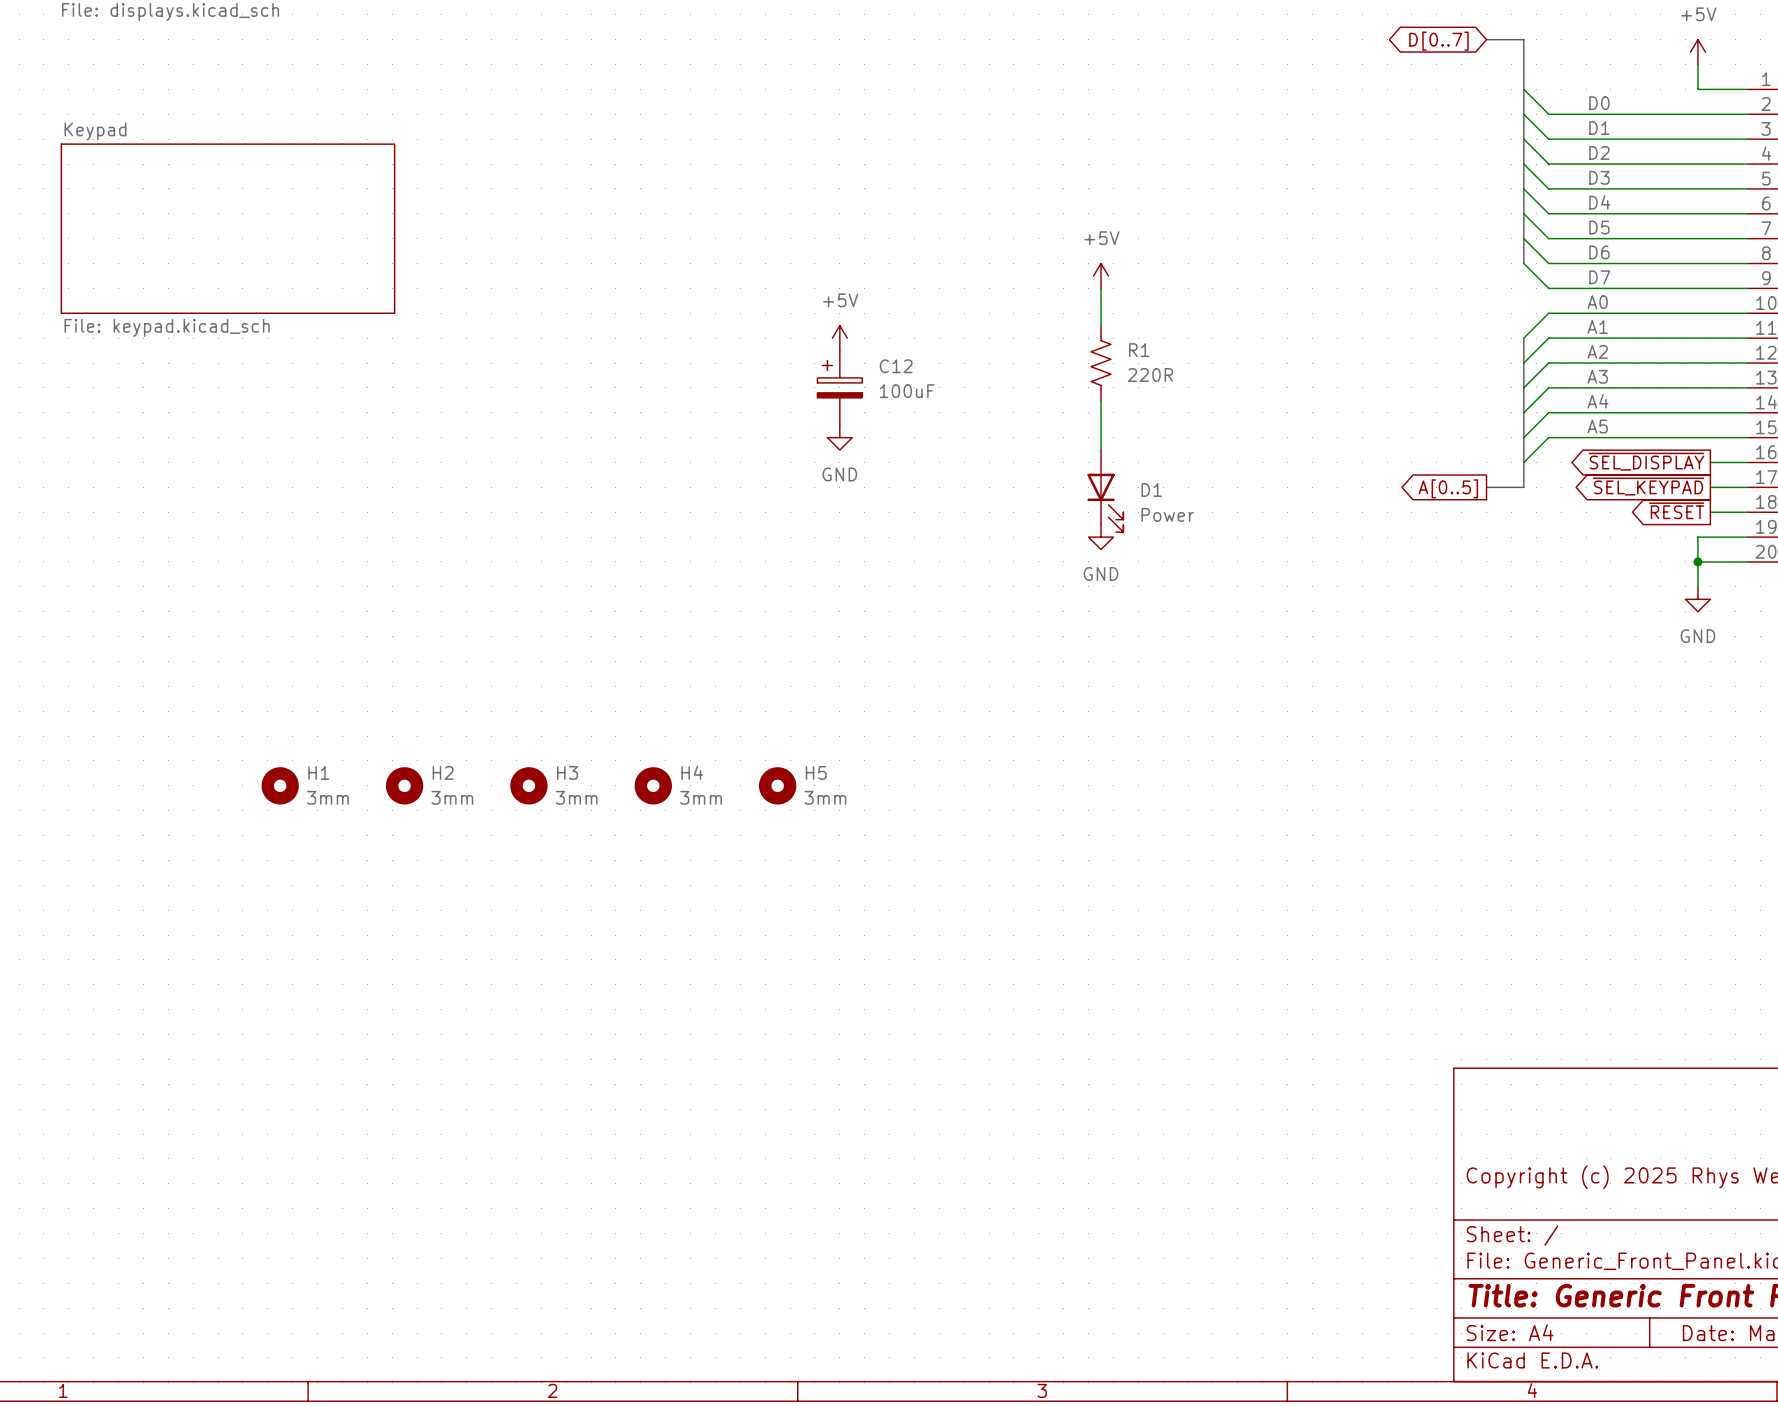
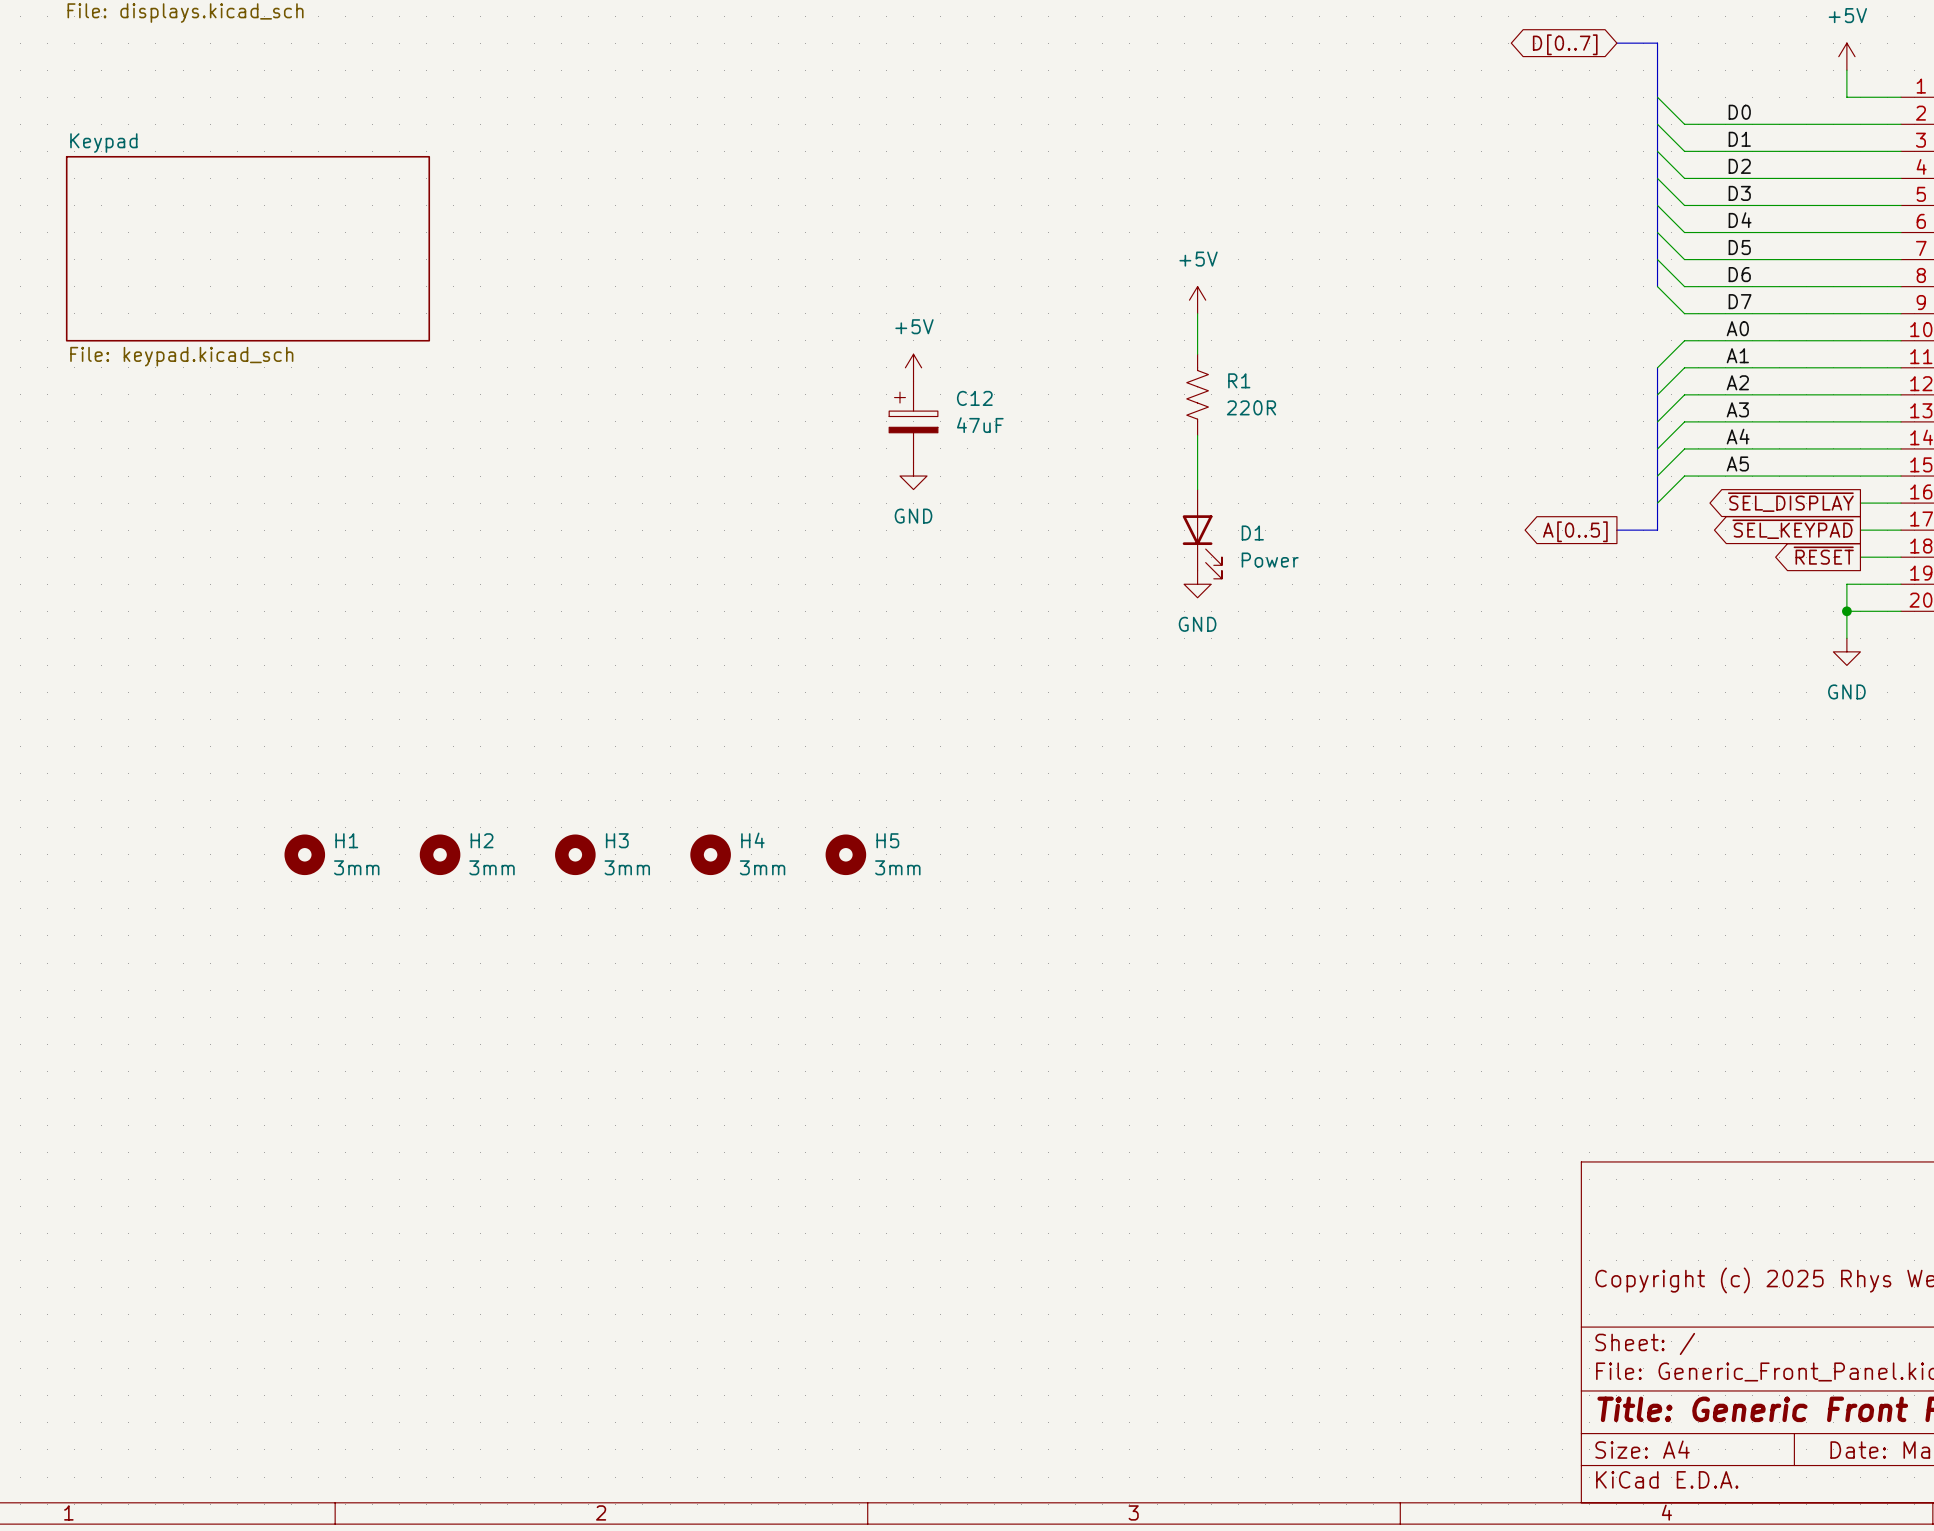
C12 value: 100uF (907, 391) -> 47uF (980, 425)

